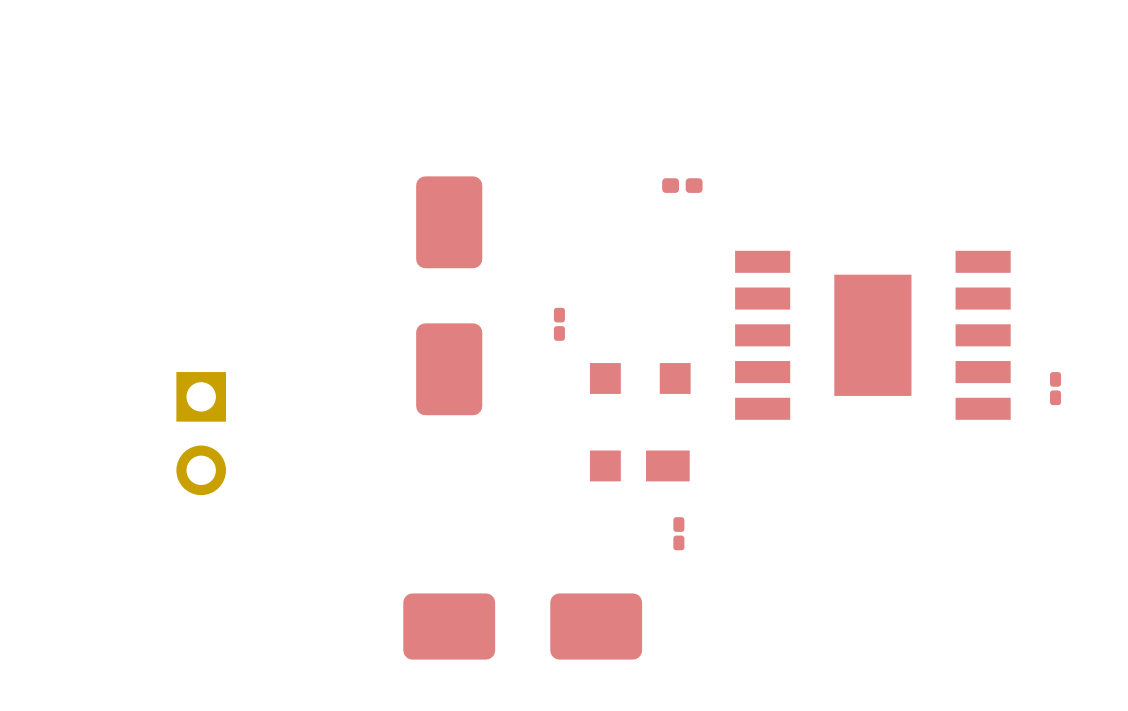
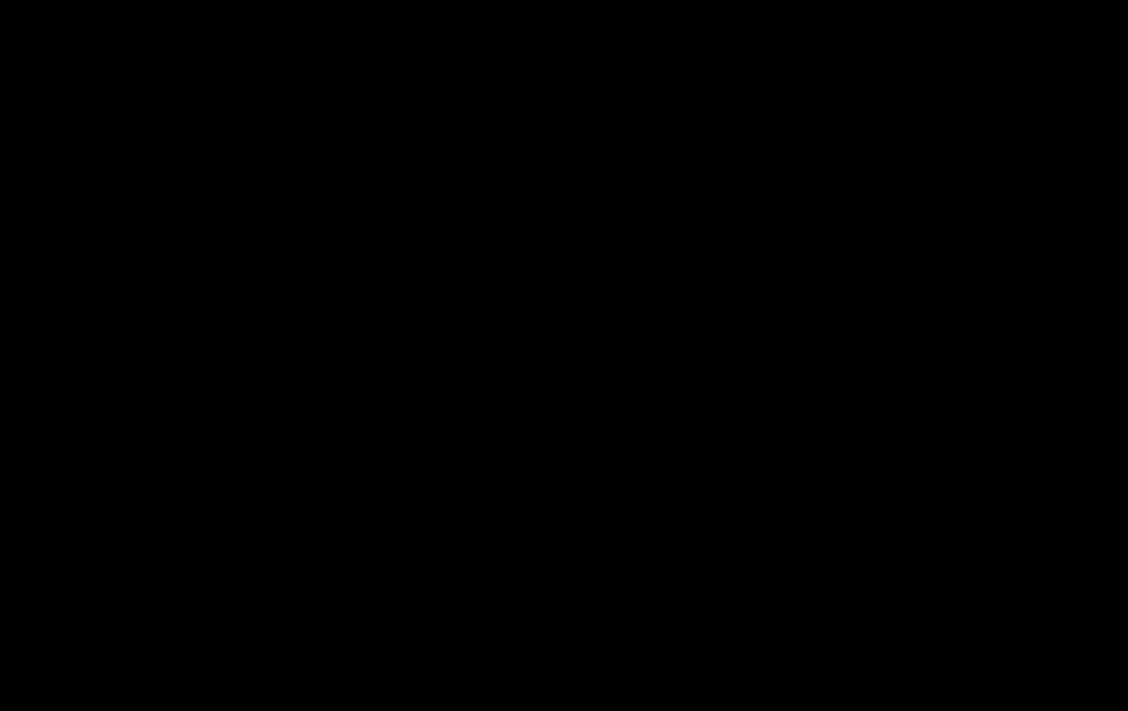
part: (682, 185) -> none
part: (449, 295) -> none
part: (559, 324) -> none
part: (872, 335) -> none
part: (1055, 388) -> none
part: (640, 422) -> none
part: (201, 433) -> none
part: (678, 533) -> none
part: (522, 626) -> none

